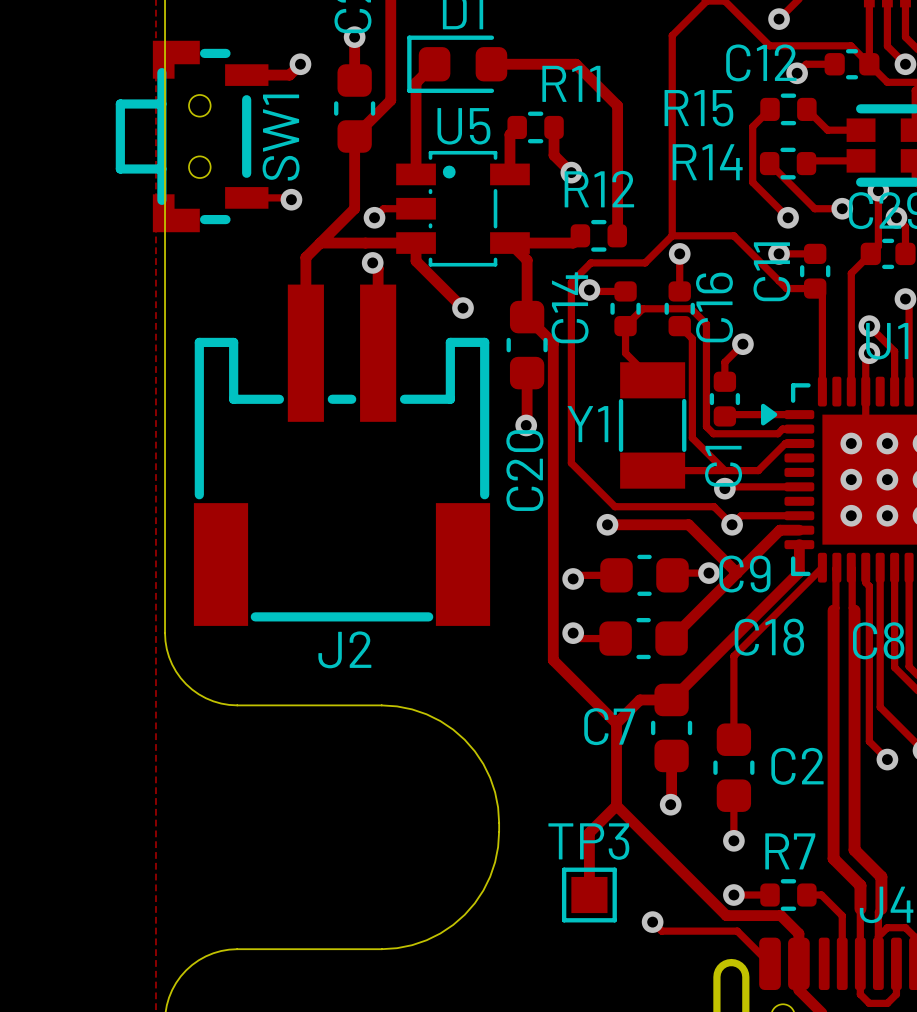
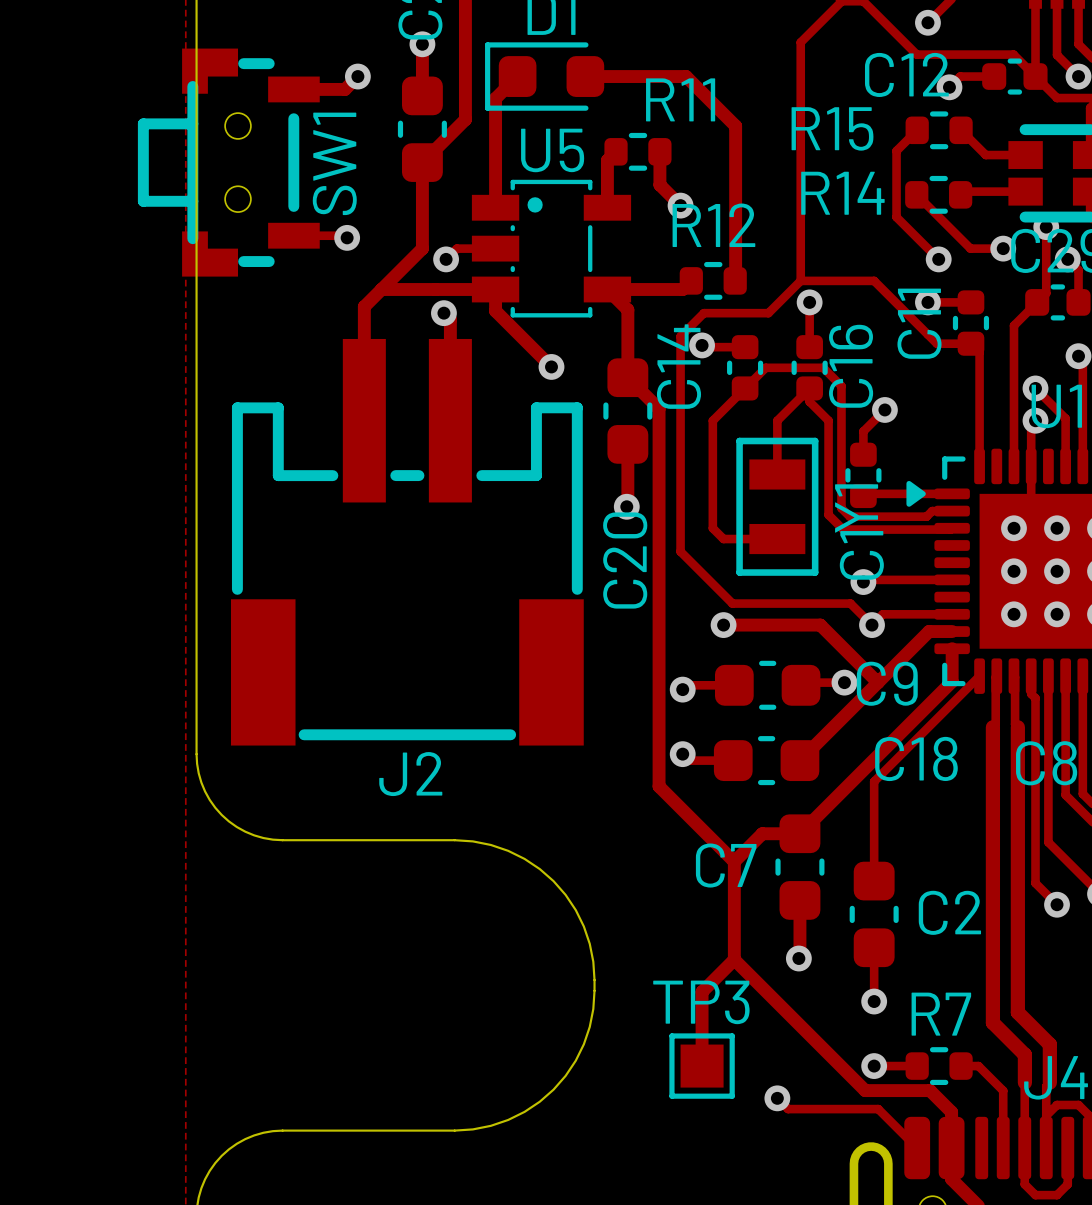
track: (625, 326) (625, 353) (652, 380) -> (745, 388) (712, 420) (712, 528) (723, 539) (777, 539)
track: (679, 326) (692, 338) (692, 438) (724, 470) -> none
Y1 footprint: [618, 362, 687, 489] -> [736, 437, 819, 576]
Y1 name position: Y1 (587, 424) -> Y1 (856, 508)
track: (799, 443) (785, 443) (758, 470) (652, 470) -> (952, 528) (843, 529) (828, 514) (828, 420) (809, 401) (809, 388) (777, 420) (777, 474)

